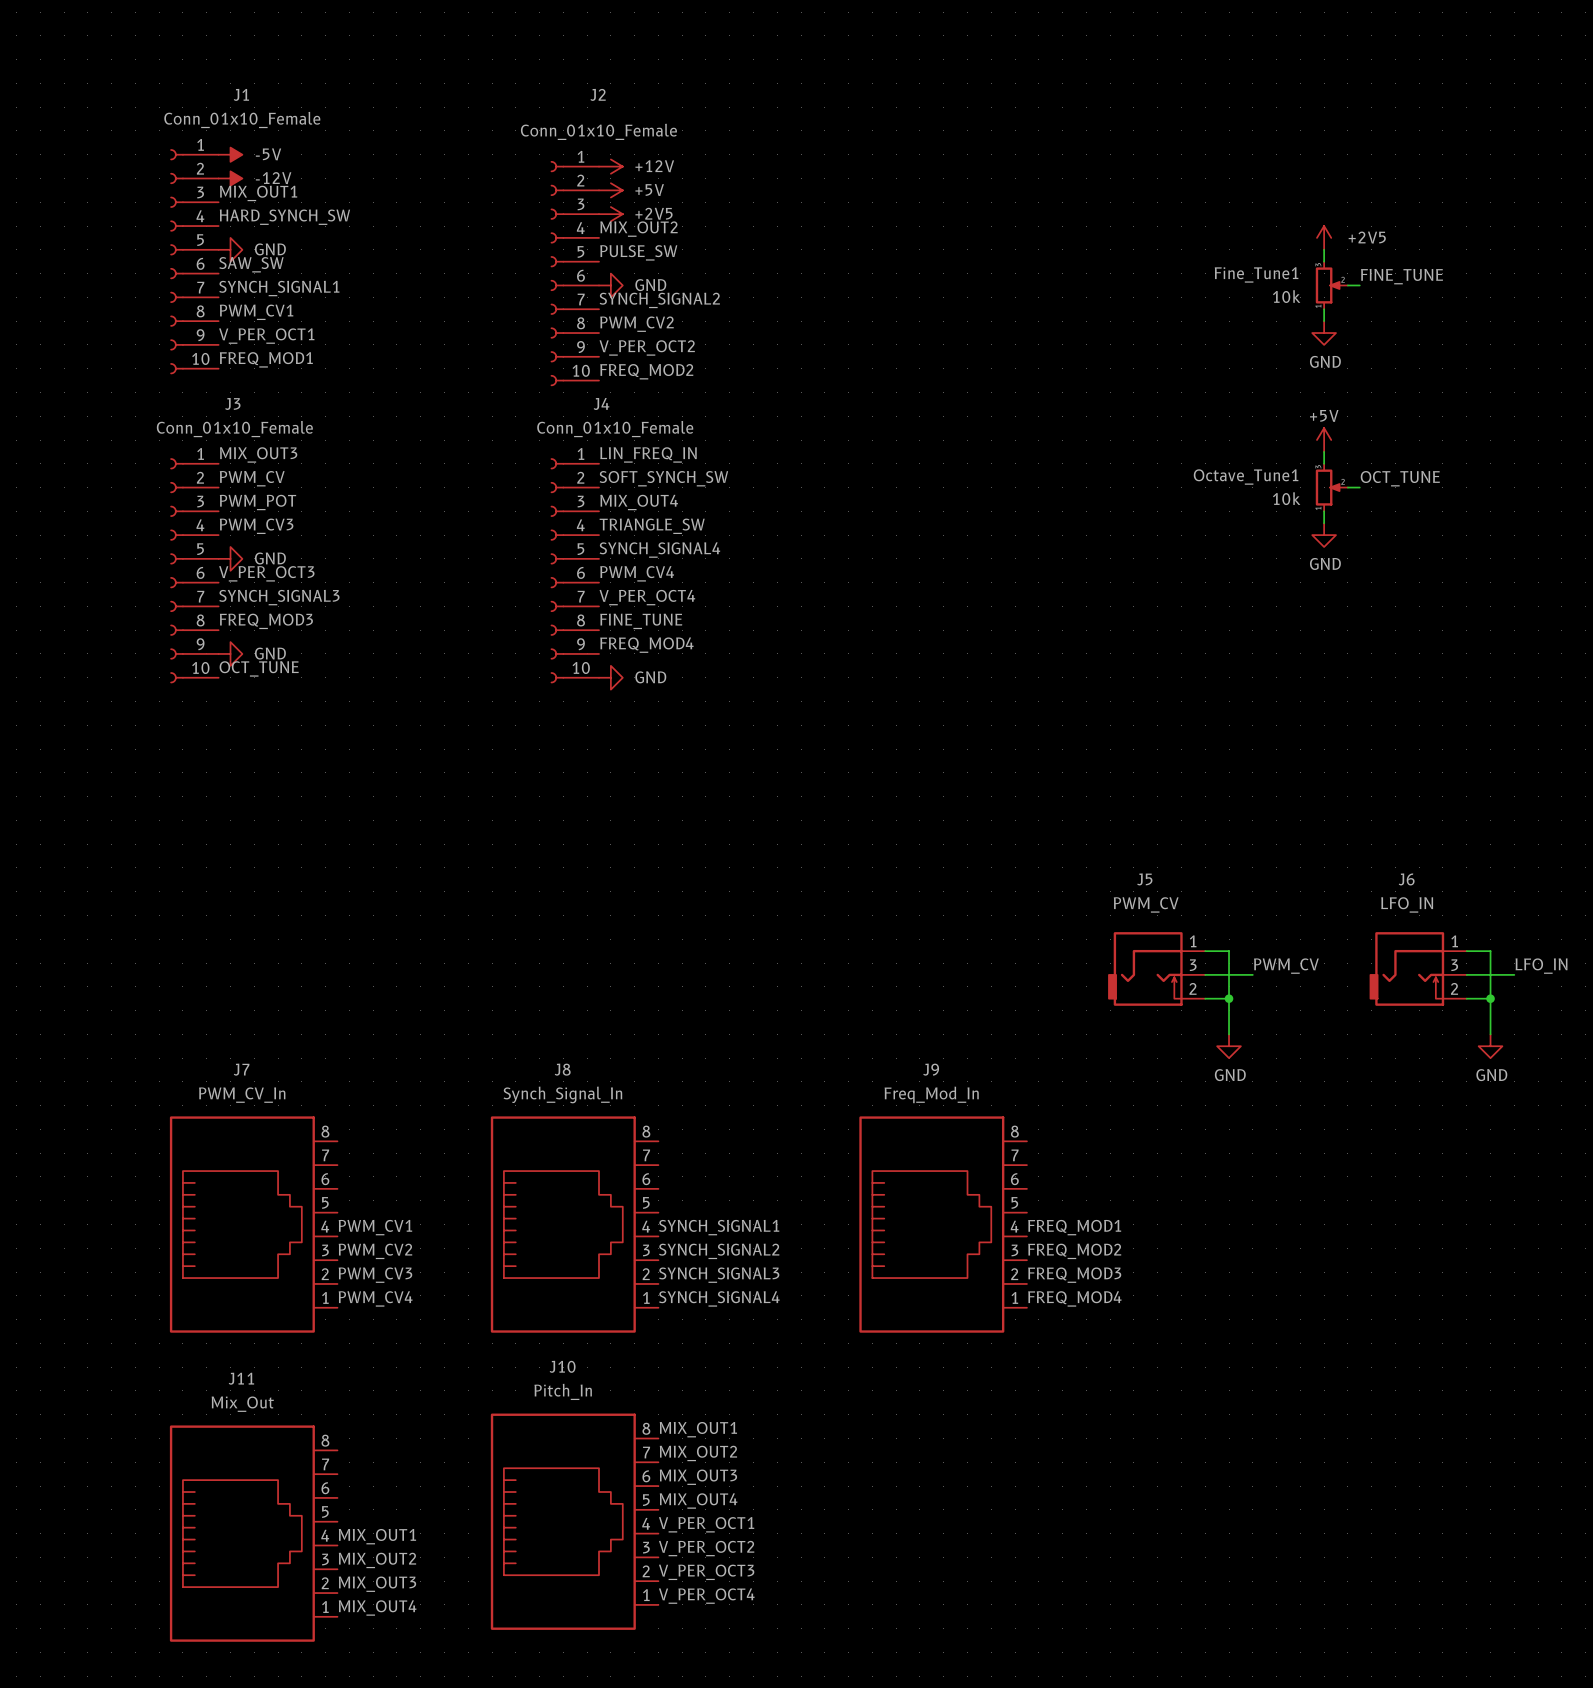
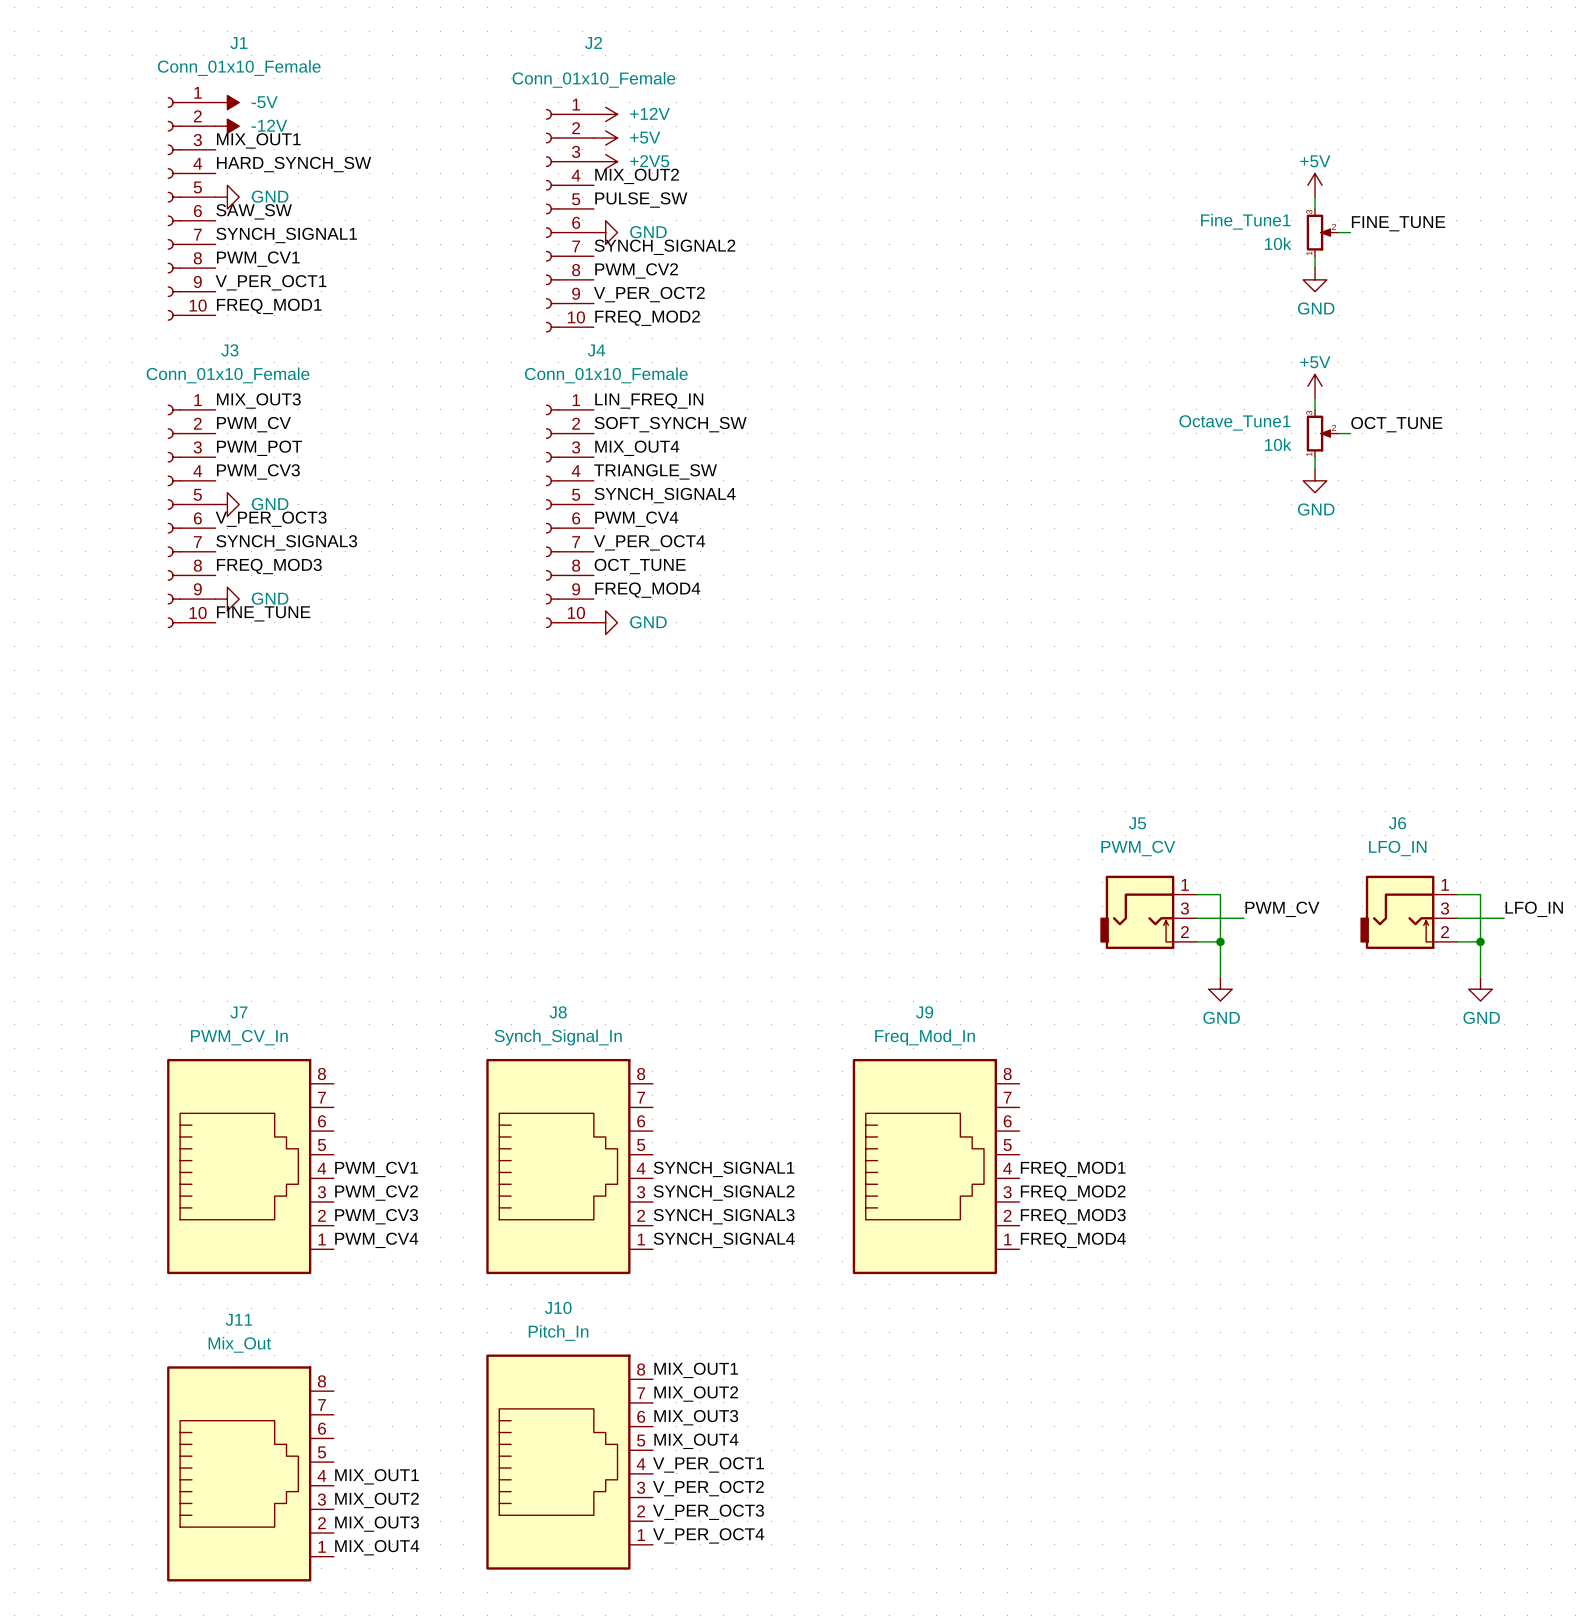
power symbol: +2V5 (1324, 237) -> +5V (1315, 185)
label: FINE_TUNE (641, 621) -> OCT_TUNE (640, 566)
label: OCT_TUNE (259, 668) -> FINE_TUNE (263, 613)

